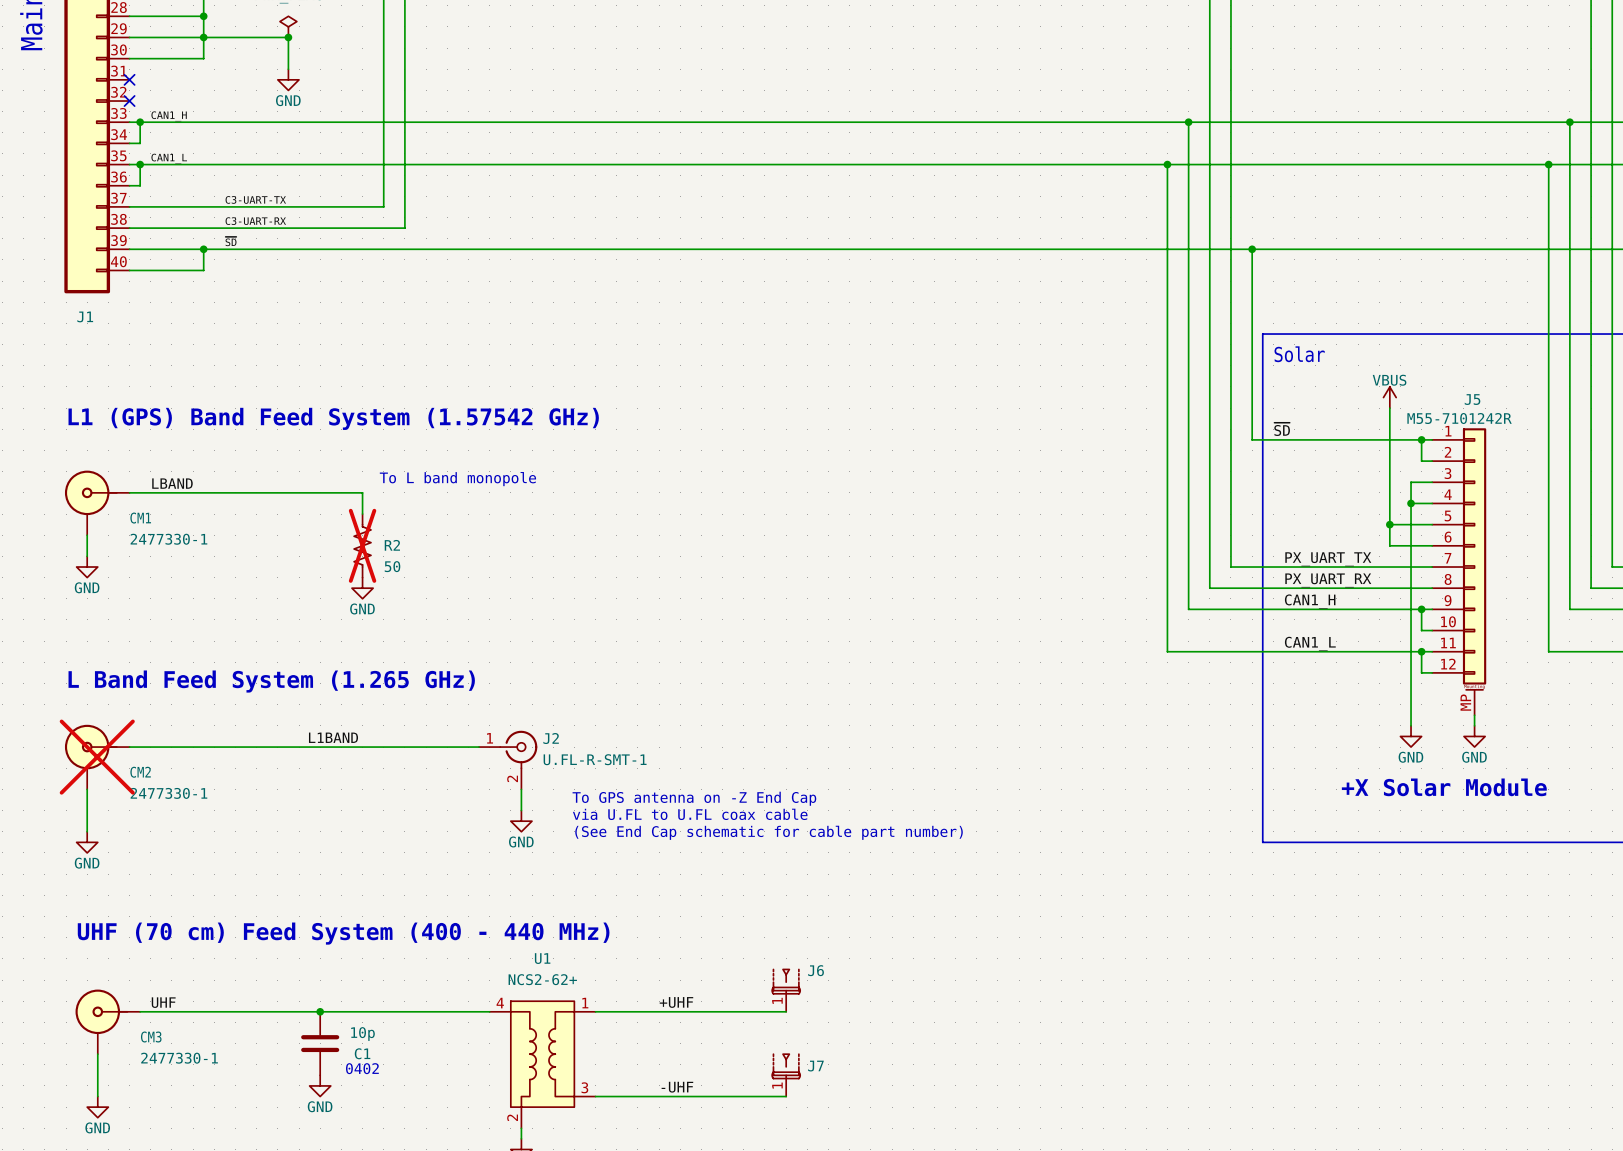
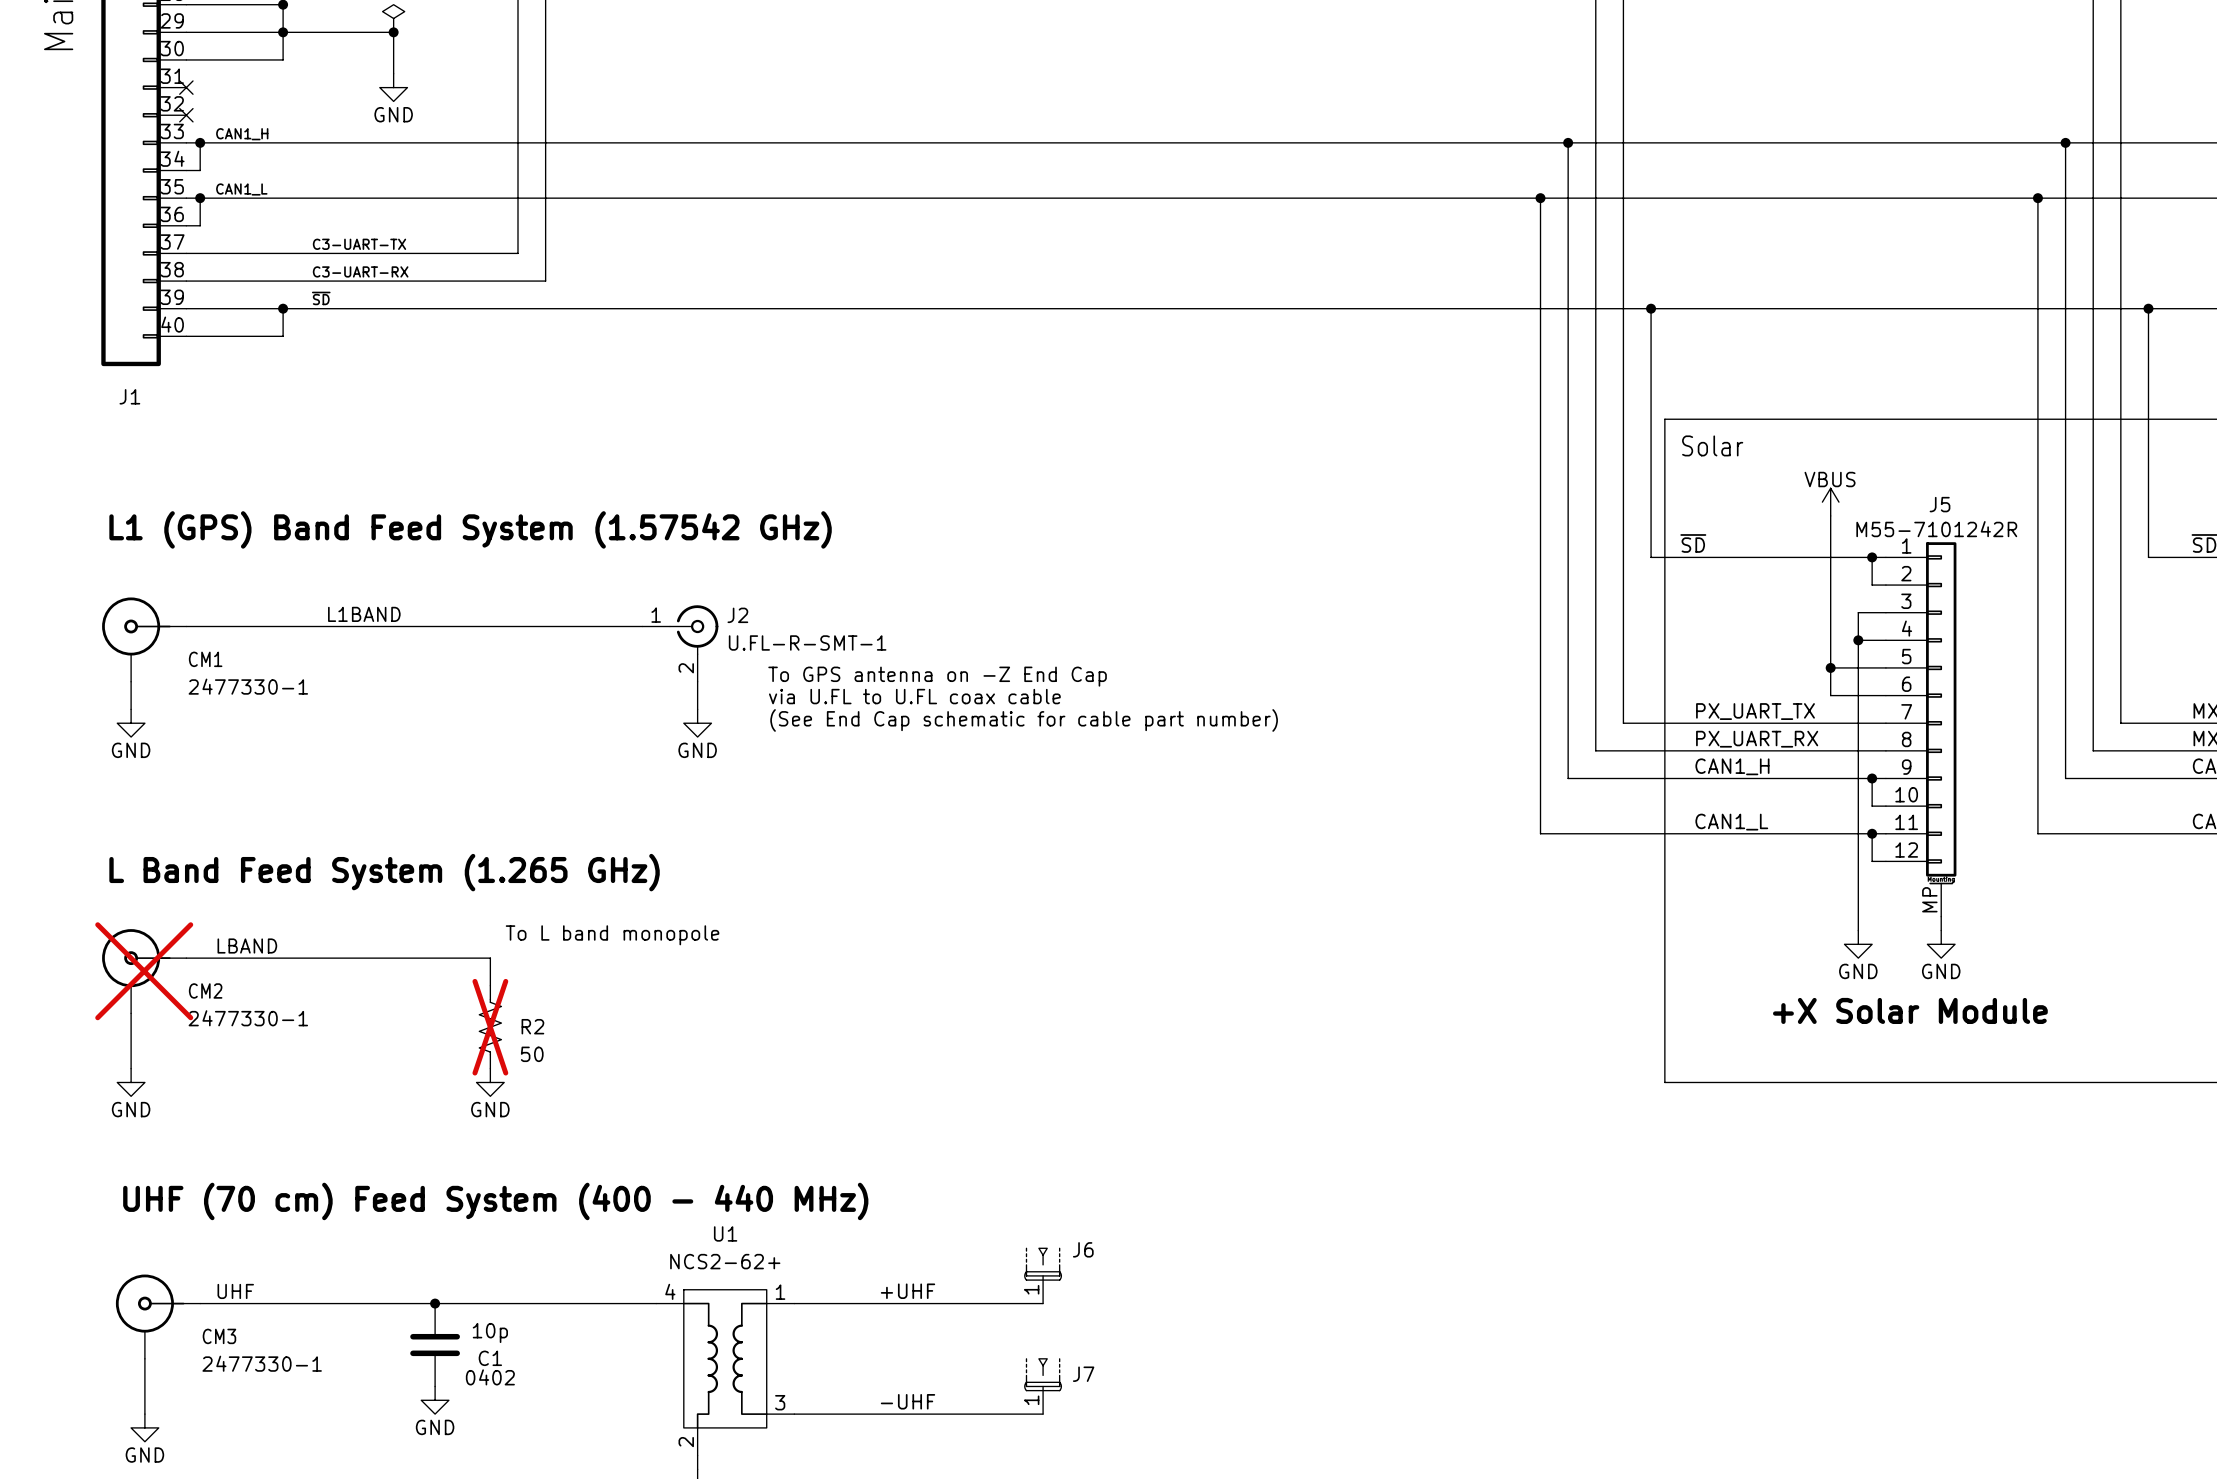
text: To L band monopole (457, 479) -> none
label: LBAND (172, 483) -> none
label: none -> L1BAND (364, 614)
wire: (362, 492) (362, 514) -> (490, 626) (642, 626)
text: none -> To GPS antenna on -Z End Cap (937, 676)
wire: none -> (697, 681) (697, 709)
R2 position: (362, 545) -> (490, 1027)
text: none -> via U.FL to U.FL coax cable (914, 696)
text: none -> (See End Cap schematic for cable part number) (1024, 720)
power symbol: none -> GND (697, 723)
power symbol: GND (362, 588) -> none
text: none -> To L band monopole (612, 935)
label: none -> LBAND (247, 946)
label: L1BAND (333, 737) -> none
wire: (362, 747) (479, 747) -> (490, 958) (490, 985)
J2 position: (508, 760) -> (680, 643)
wire: (521, 789) (521, 810) -> none
text: To GPS antenna on -Z End Cap (694, 798) -> none
text: via U.FL to U.FL coax cable (690, 814) -> none
power symbol: GND (521, 821) -> none
text: (See End Cap schematic for cable part number) (769, 832) -> none
power symbol: none -> GND (490, 1082)

